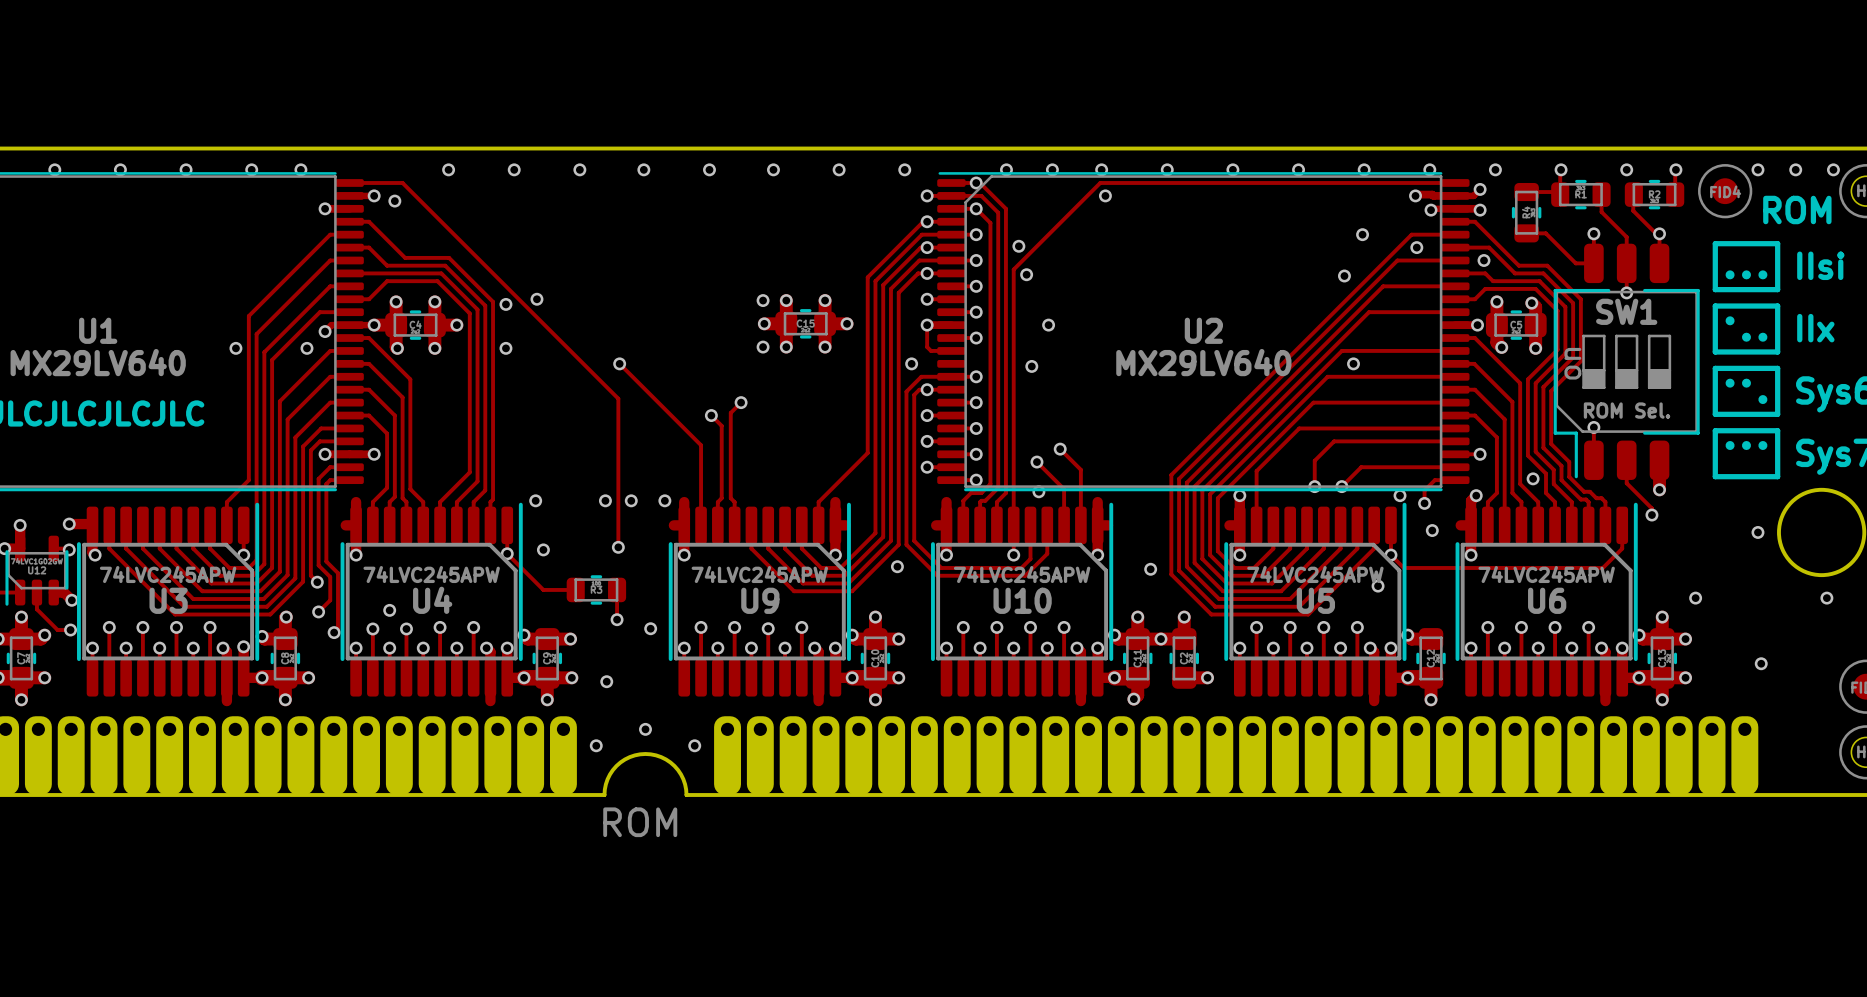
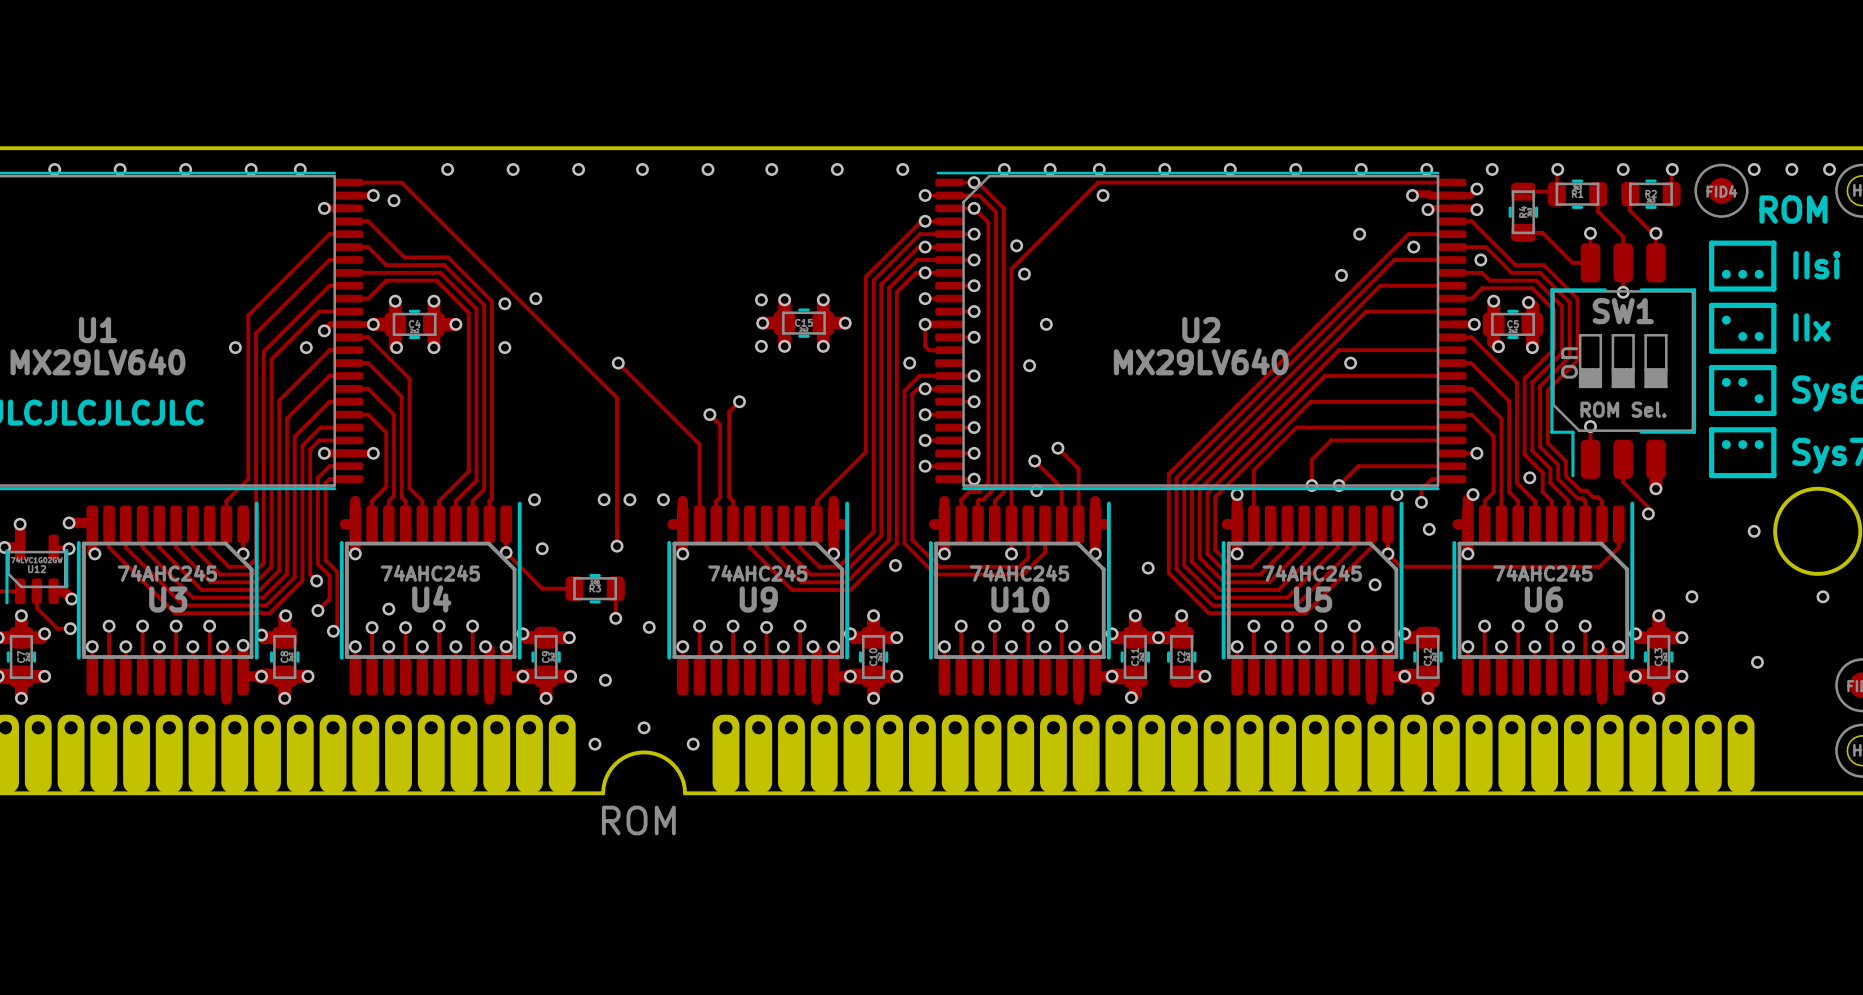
U3 value: 74LVC245APW (168, 574) -> 74AHC245 (167, 573)
U4 value: 74LVC245APW (431, 574) -> 74AHC245 (430, 573)
U9 value: 74LVC245APW (759, 574) -> 74AHC245 (757, 573)
U10 value: 74LVC245APW (1022, 574) -> 74AHC245 (1019, 573)
U5 value: 74LVC245APW (1315, 574) -> 74AHC245 (1312, 573)
U6 value: 74LVC245APW (1546, 574) -> 74AHC245 (1543, 573)

